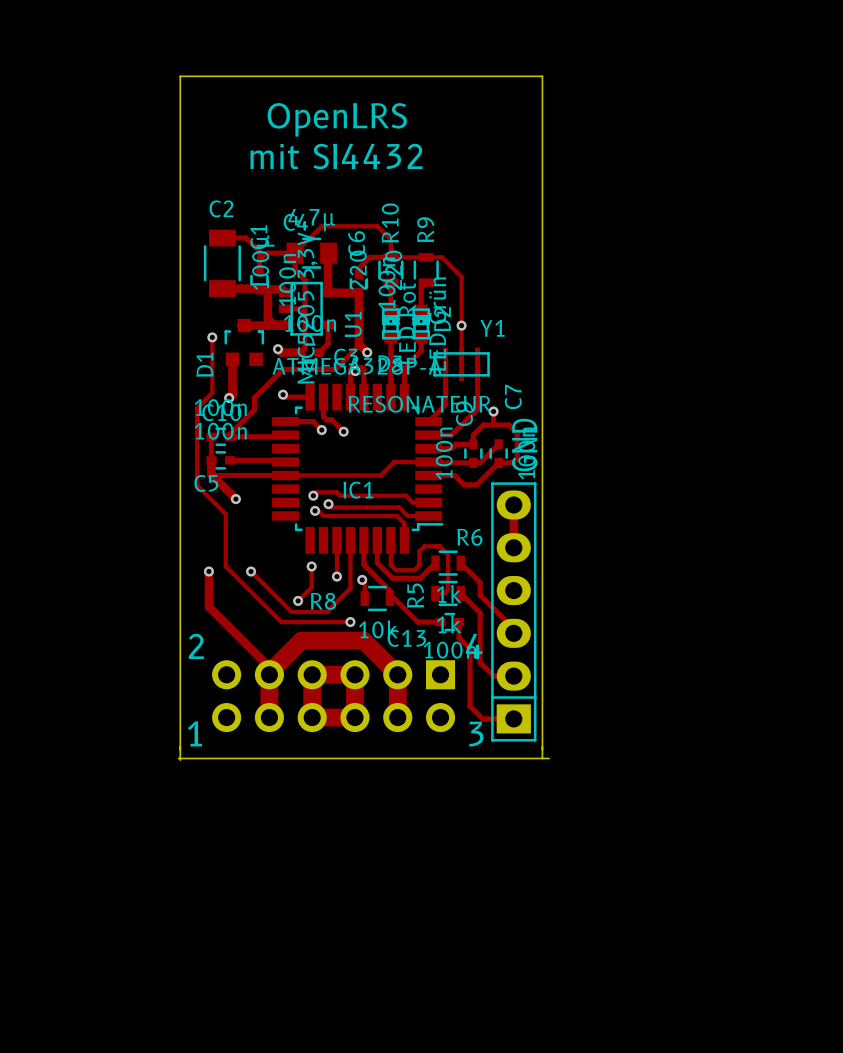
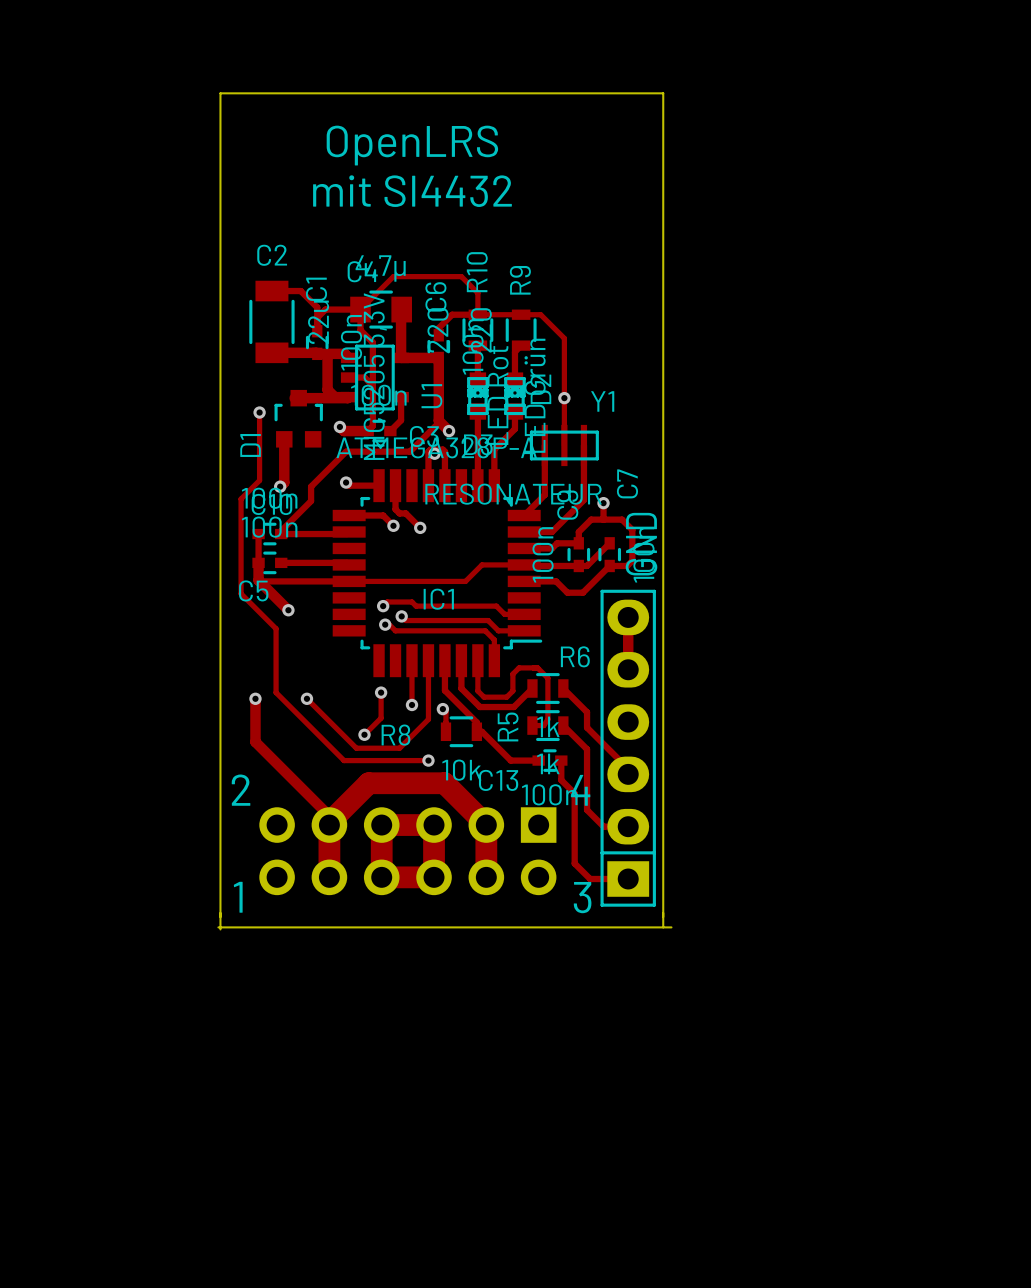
C2 value: 100µ (263, 262) -> 22u (318, 322)

